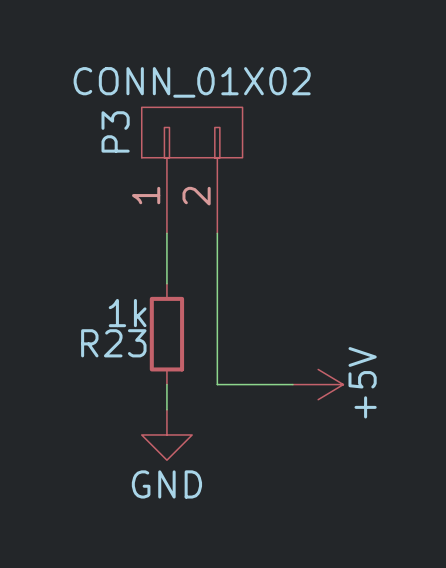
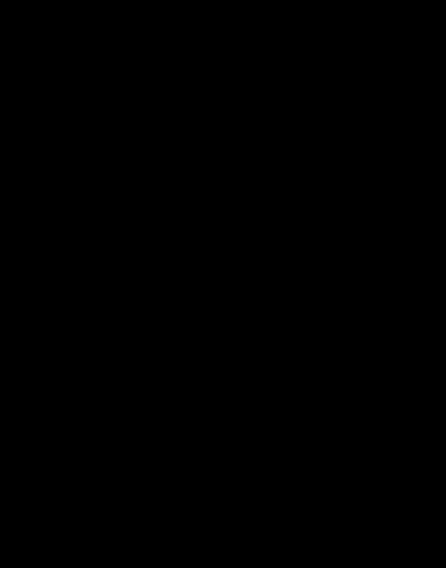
P3: CONN_01X02 (192, 170) -> none
wire: (166, 233) (166, 283) -> none
wire: (217, 233) (217, 384) (292, 384) -> none
R23: 1k (166, 334) -> none
wire: (166, 384) (166, 409) -> none
power symbol: +5V (318, 384) -> none
power symbol: GND (166, 434) -> none

